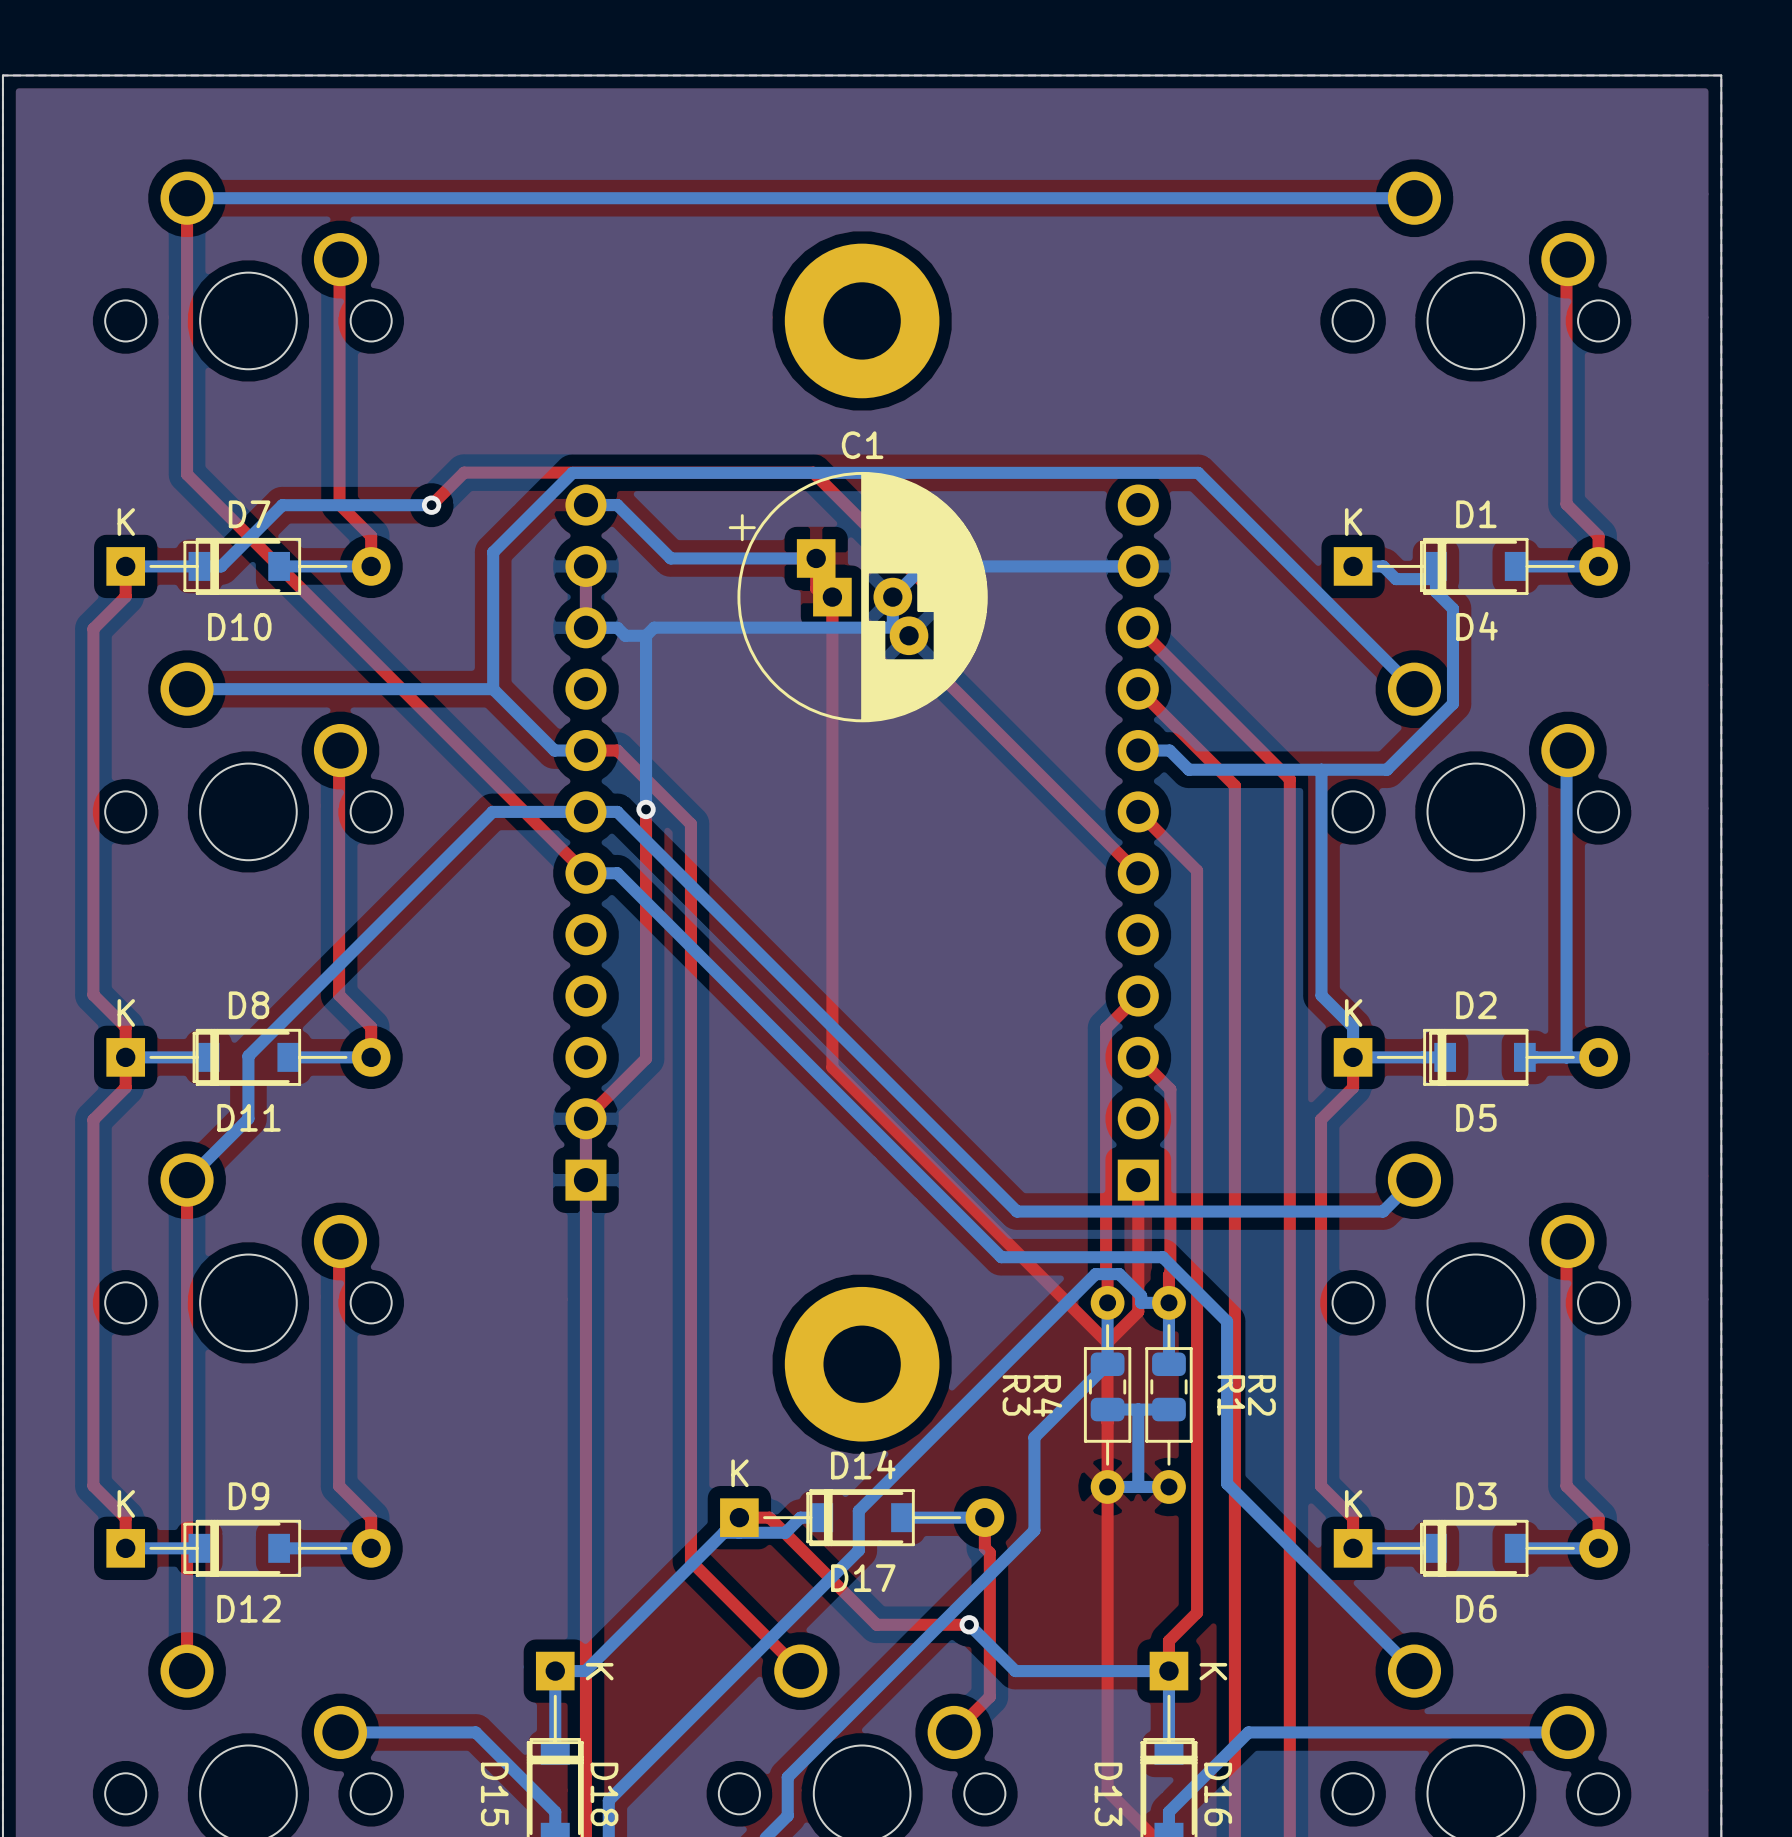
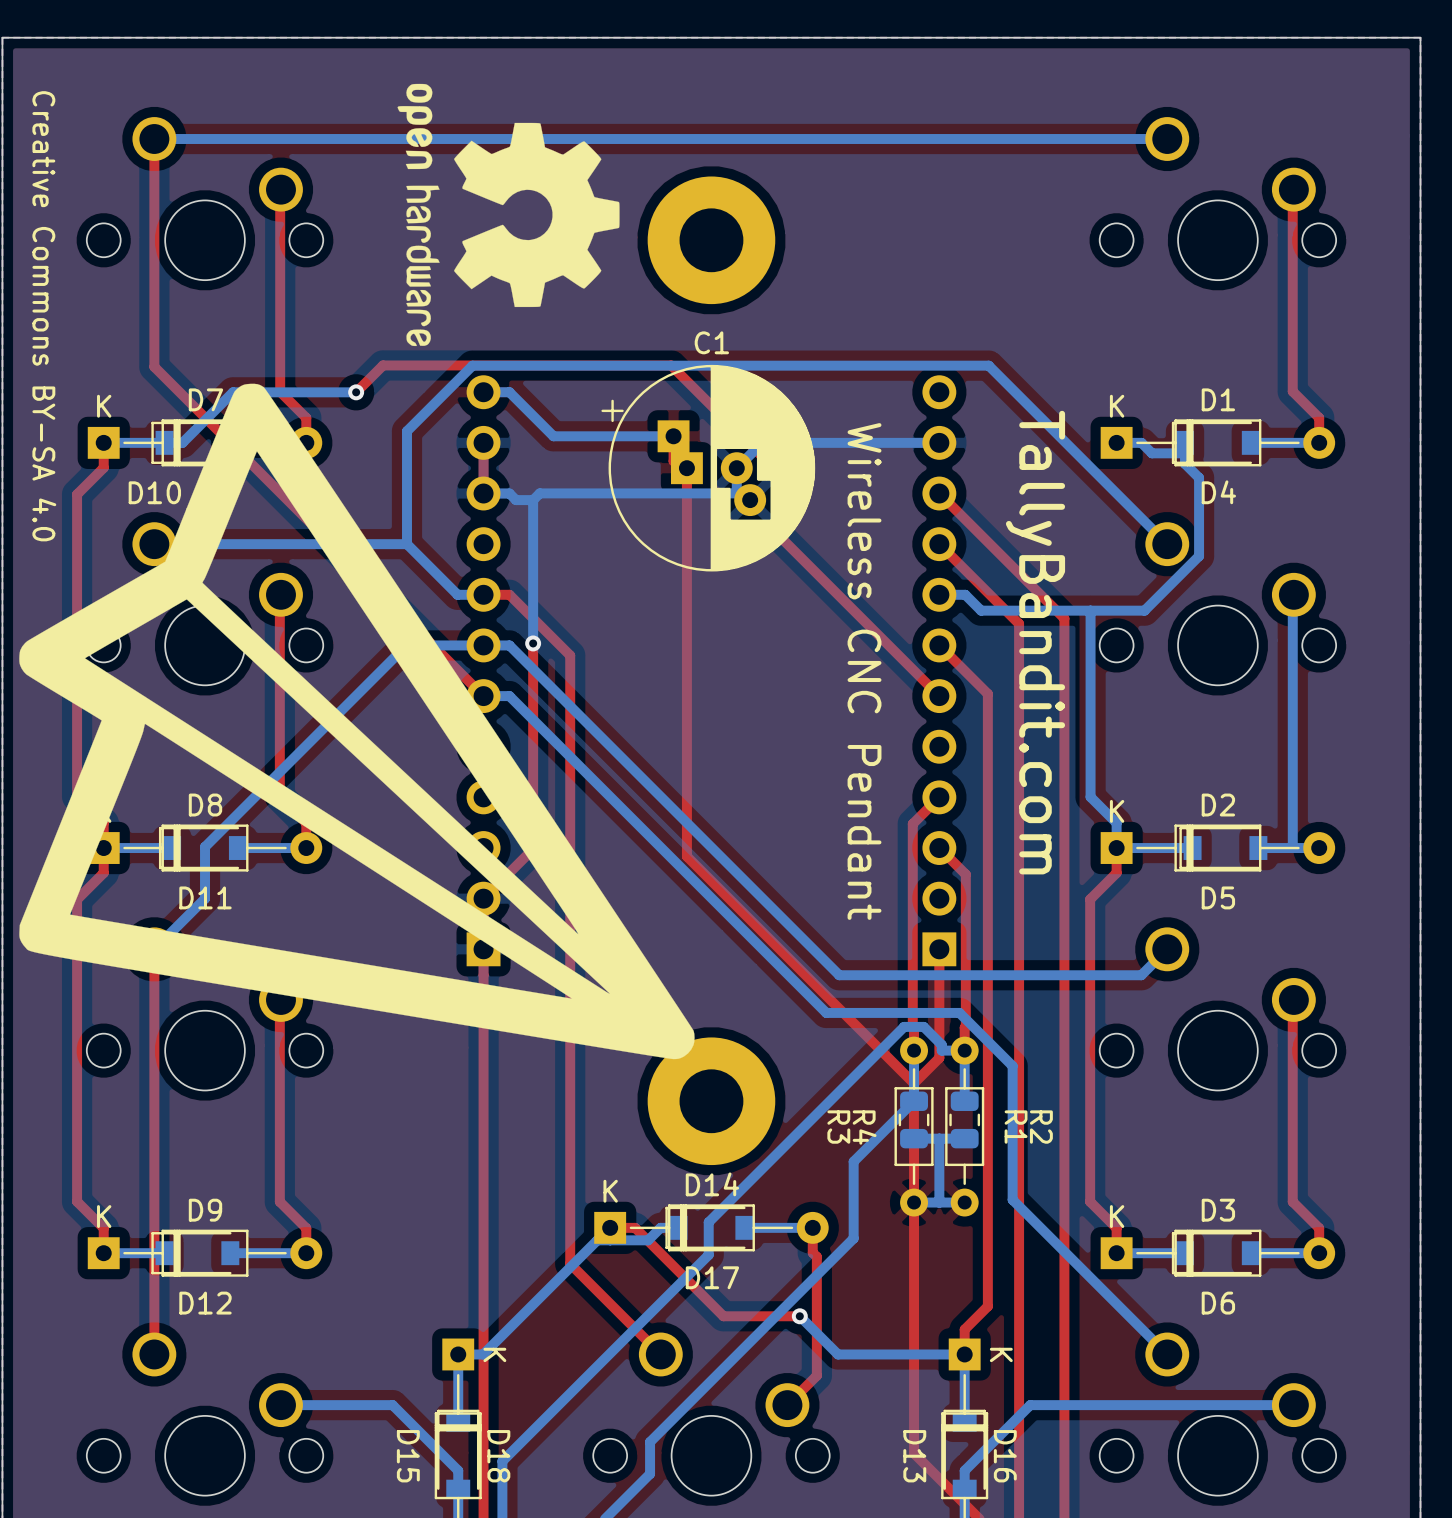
drawing: none -> [397, 83, 620, 347]
text: none -> Creative Commons BY-SA 4.0 (44, 316)
drawing: none -> [19, 383, 695, 1060]
D10 name position: D10 (239, 626) -> D10 (154, 492)
text: none -> TallyBandit.com (1035, 642)
text: none -> Wireless CNC Pendant (864, 671)

